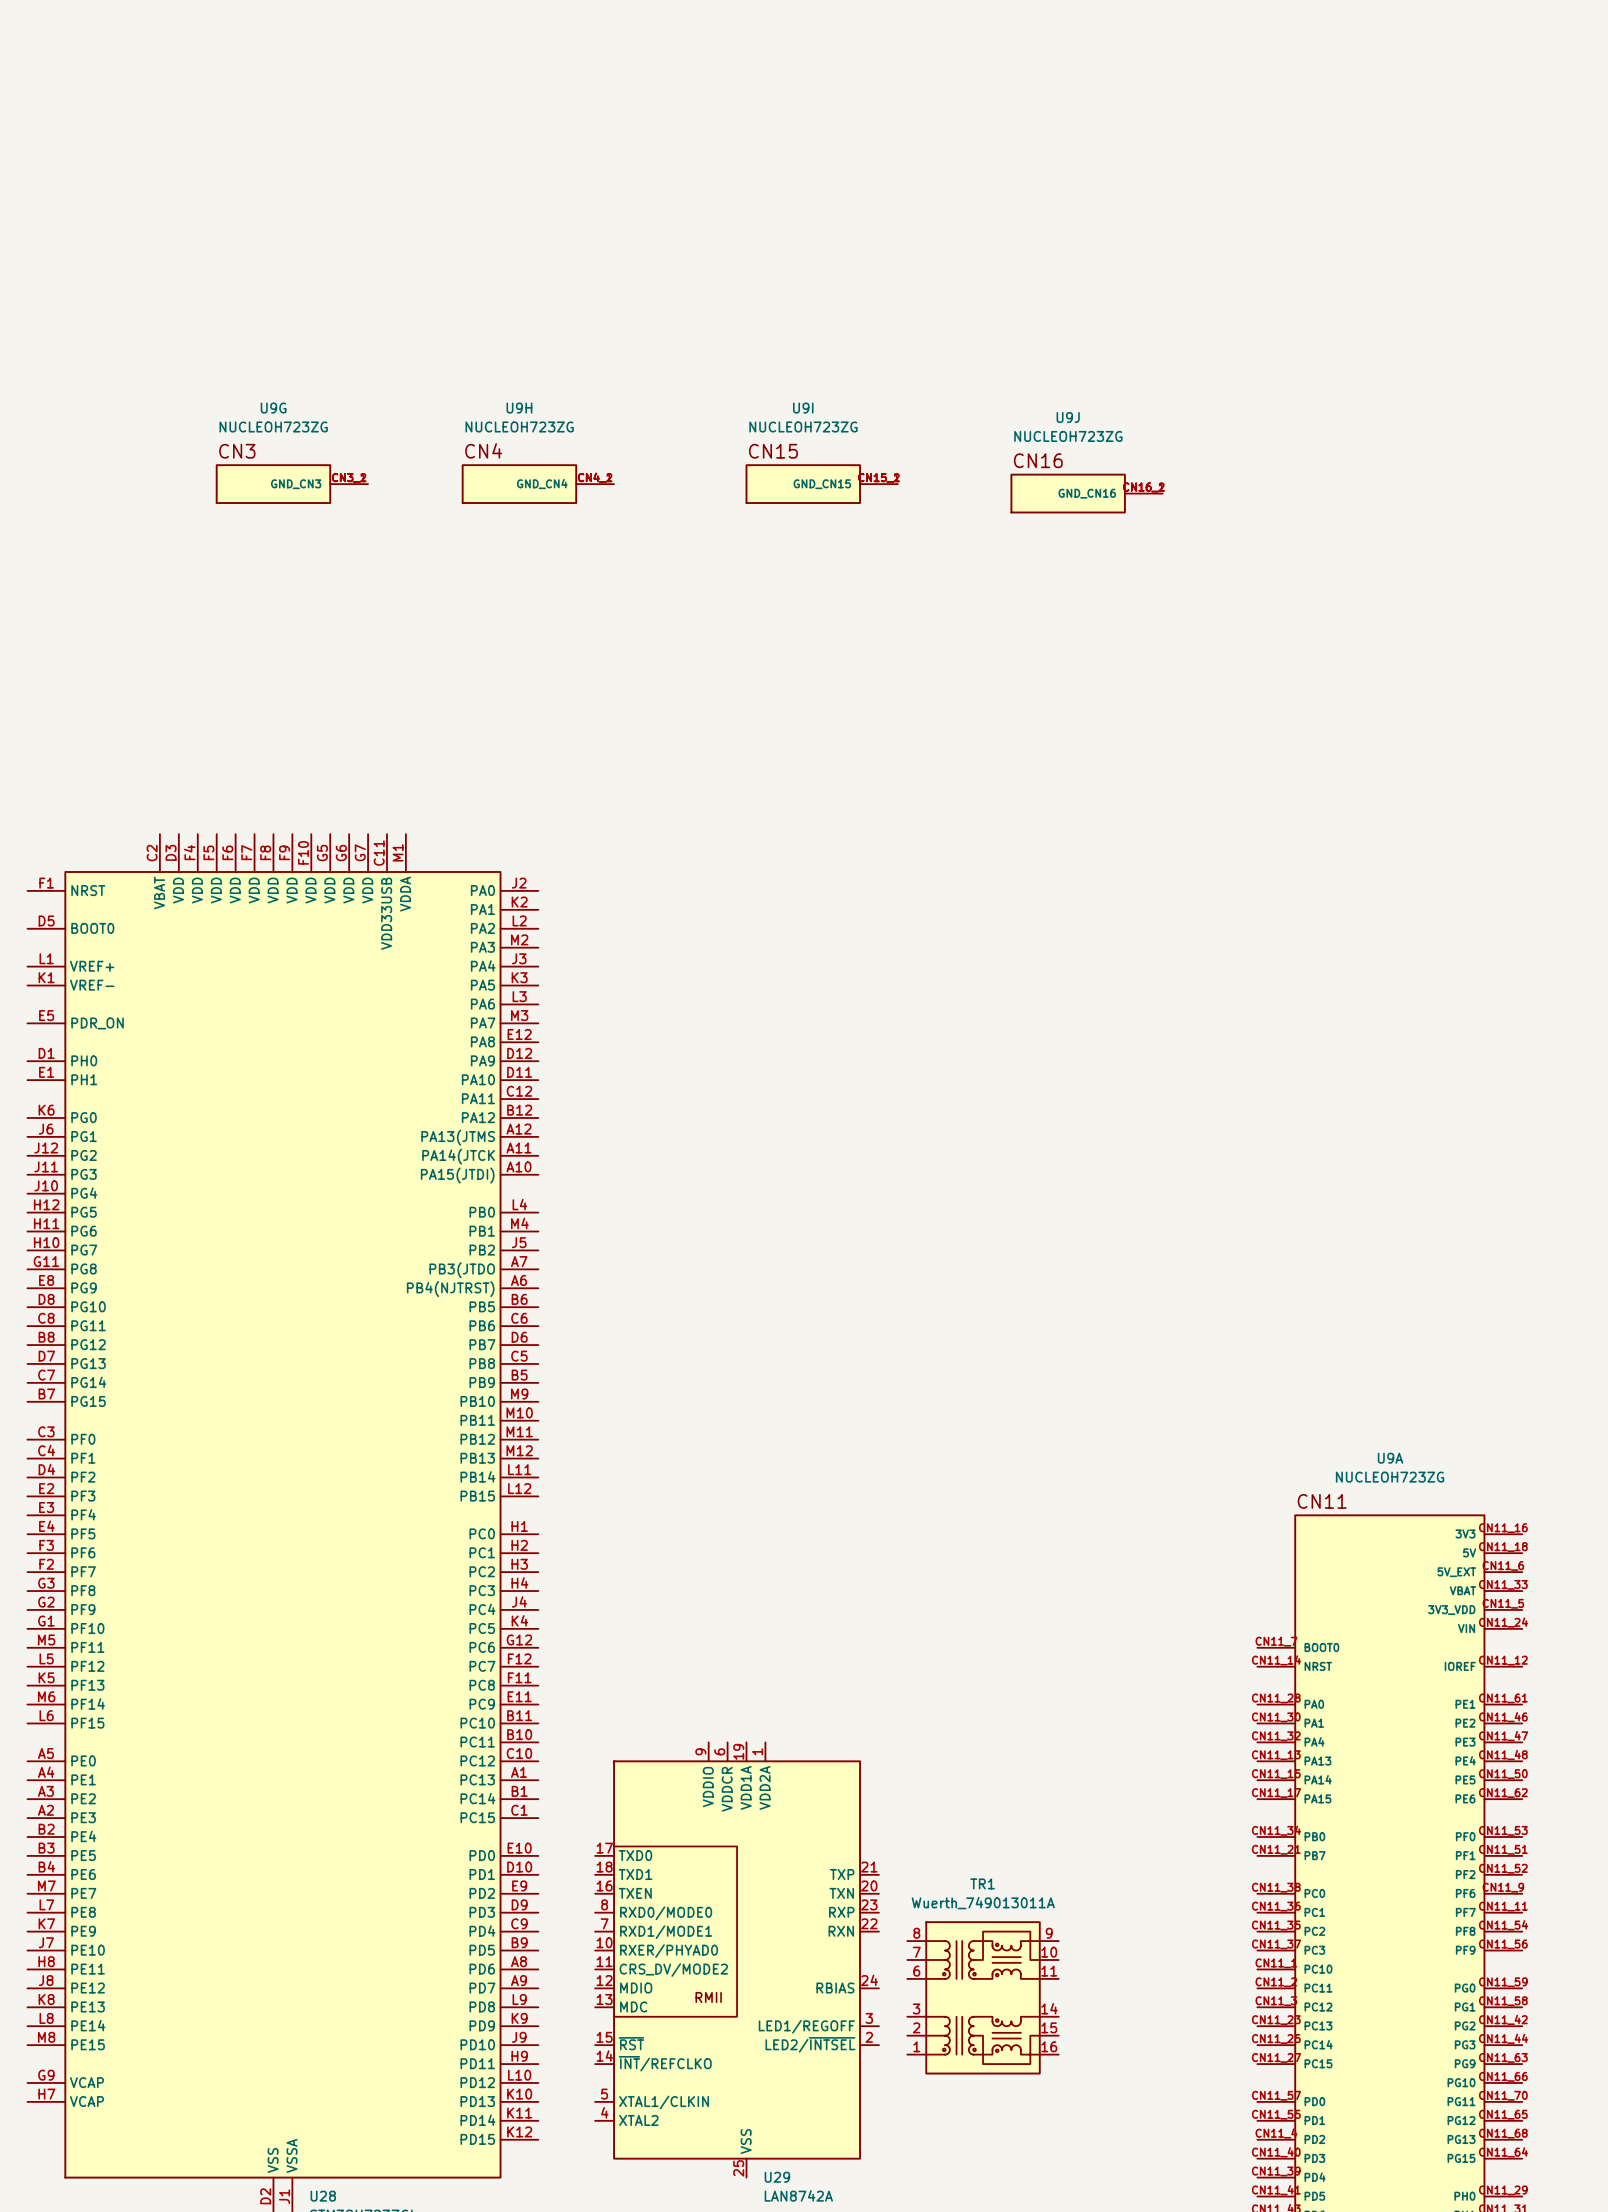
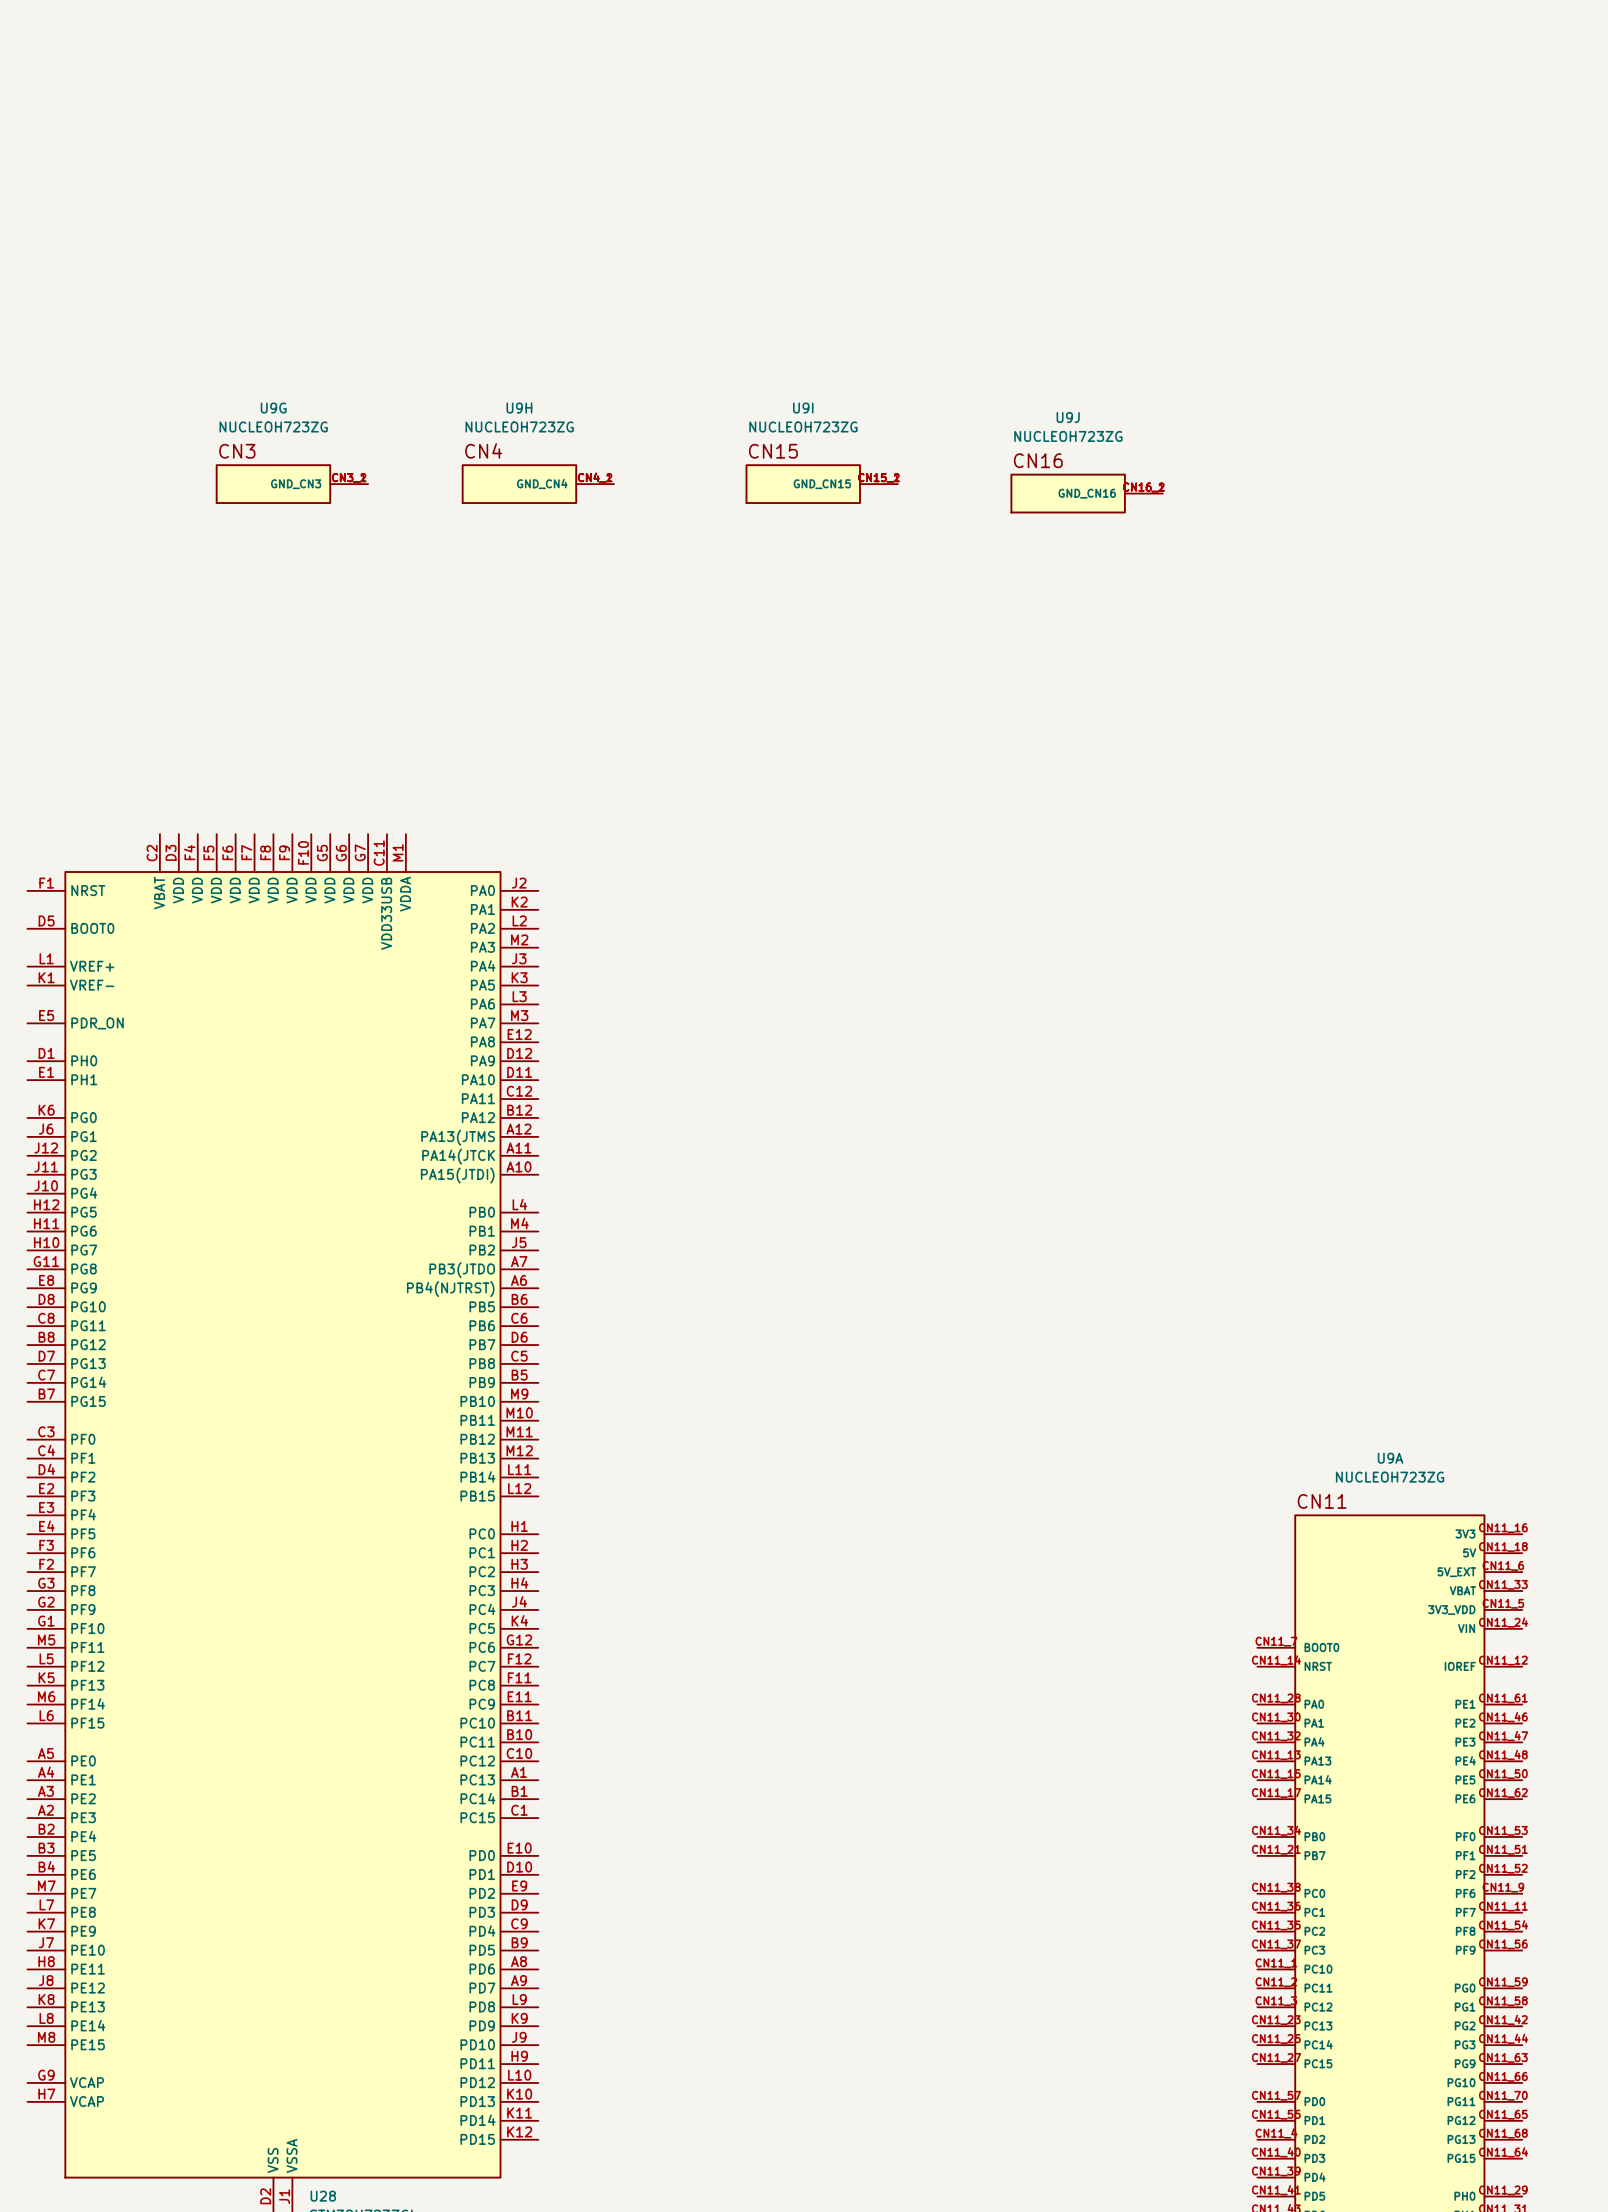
U29: LAN8742A (737, 1959) -> none
TR1: Wuerth_749013011A (983, 1997) -> none

